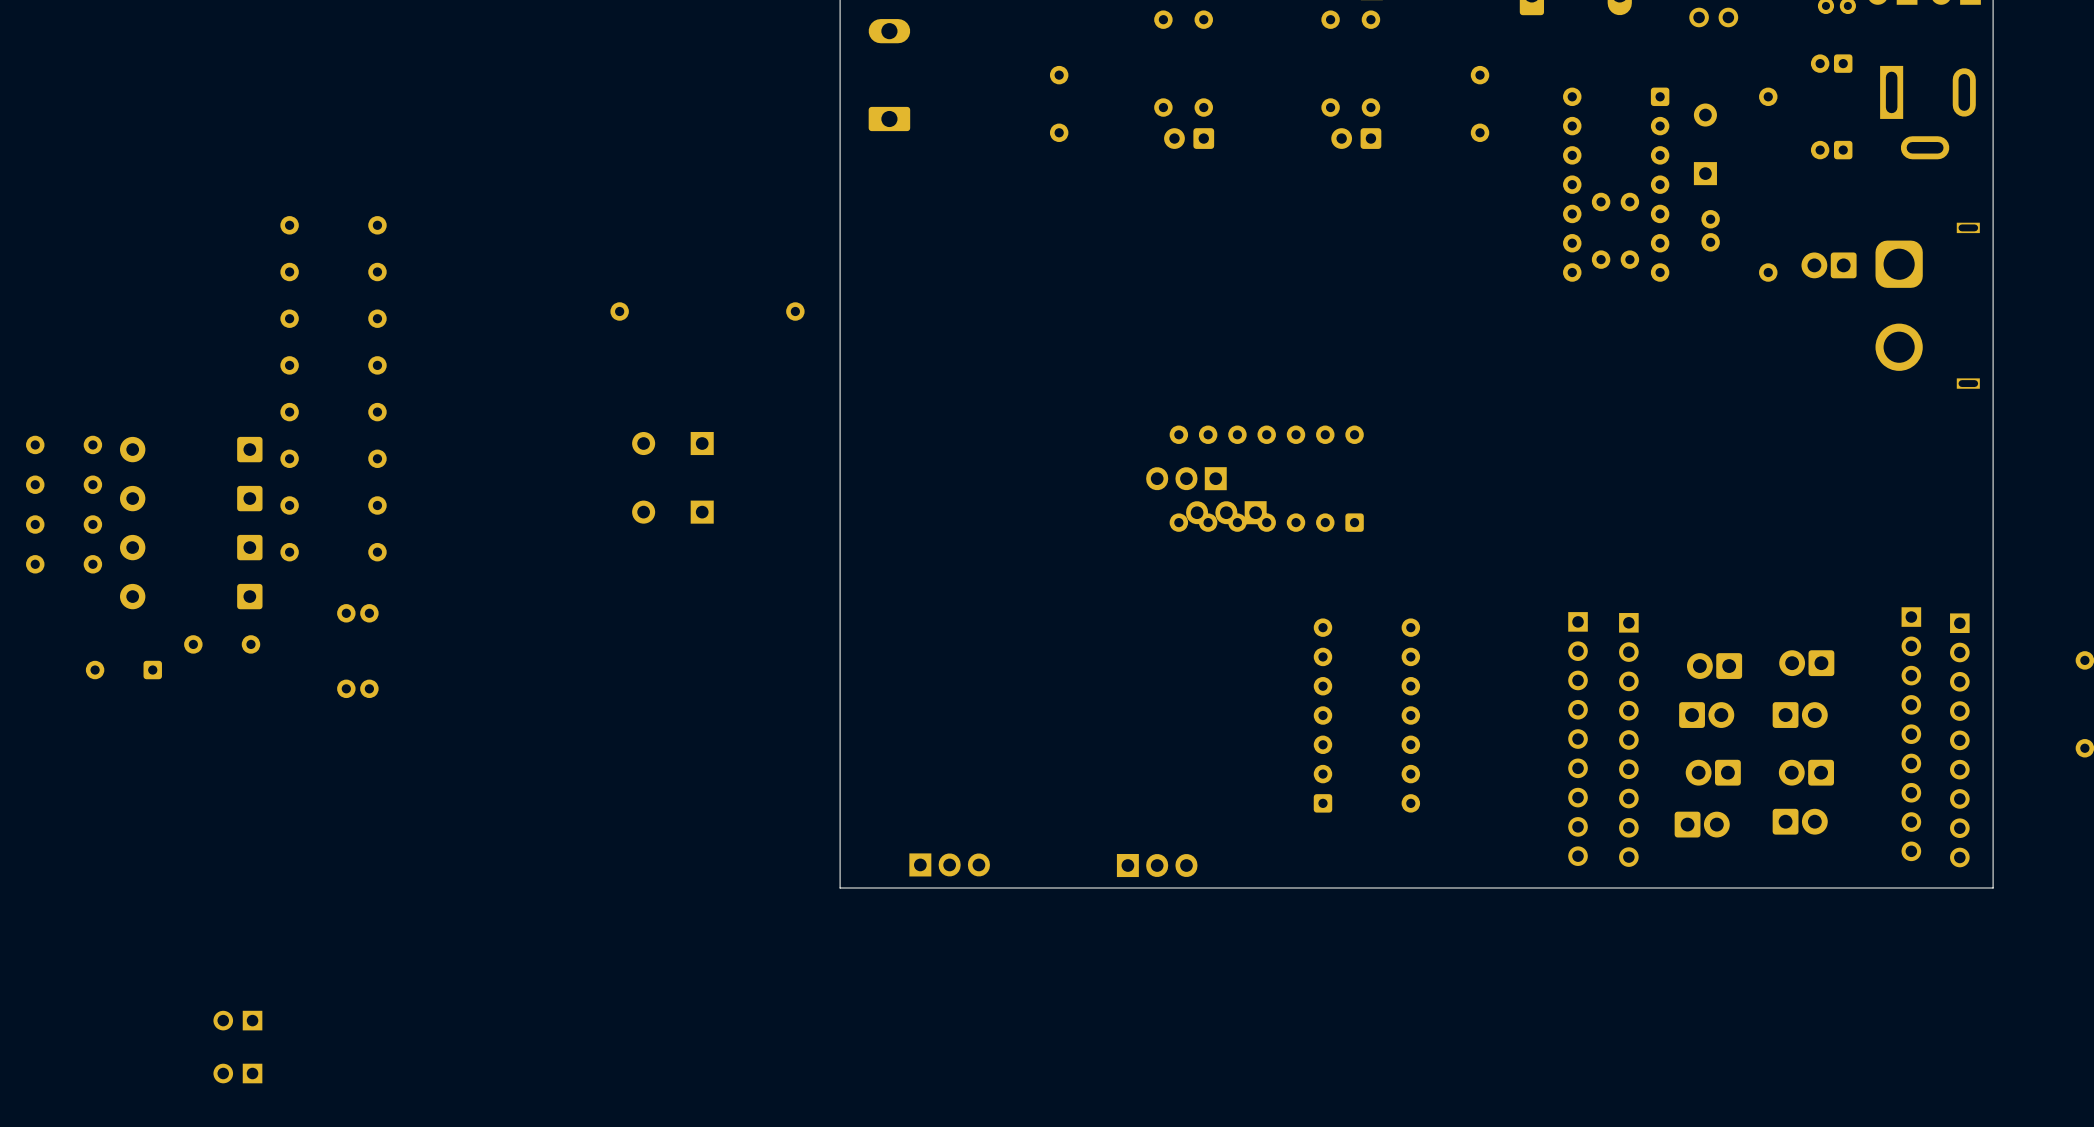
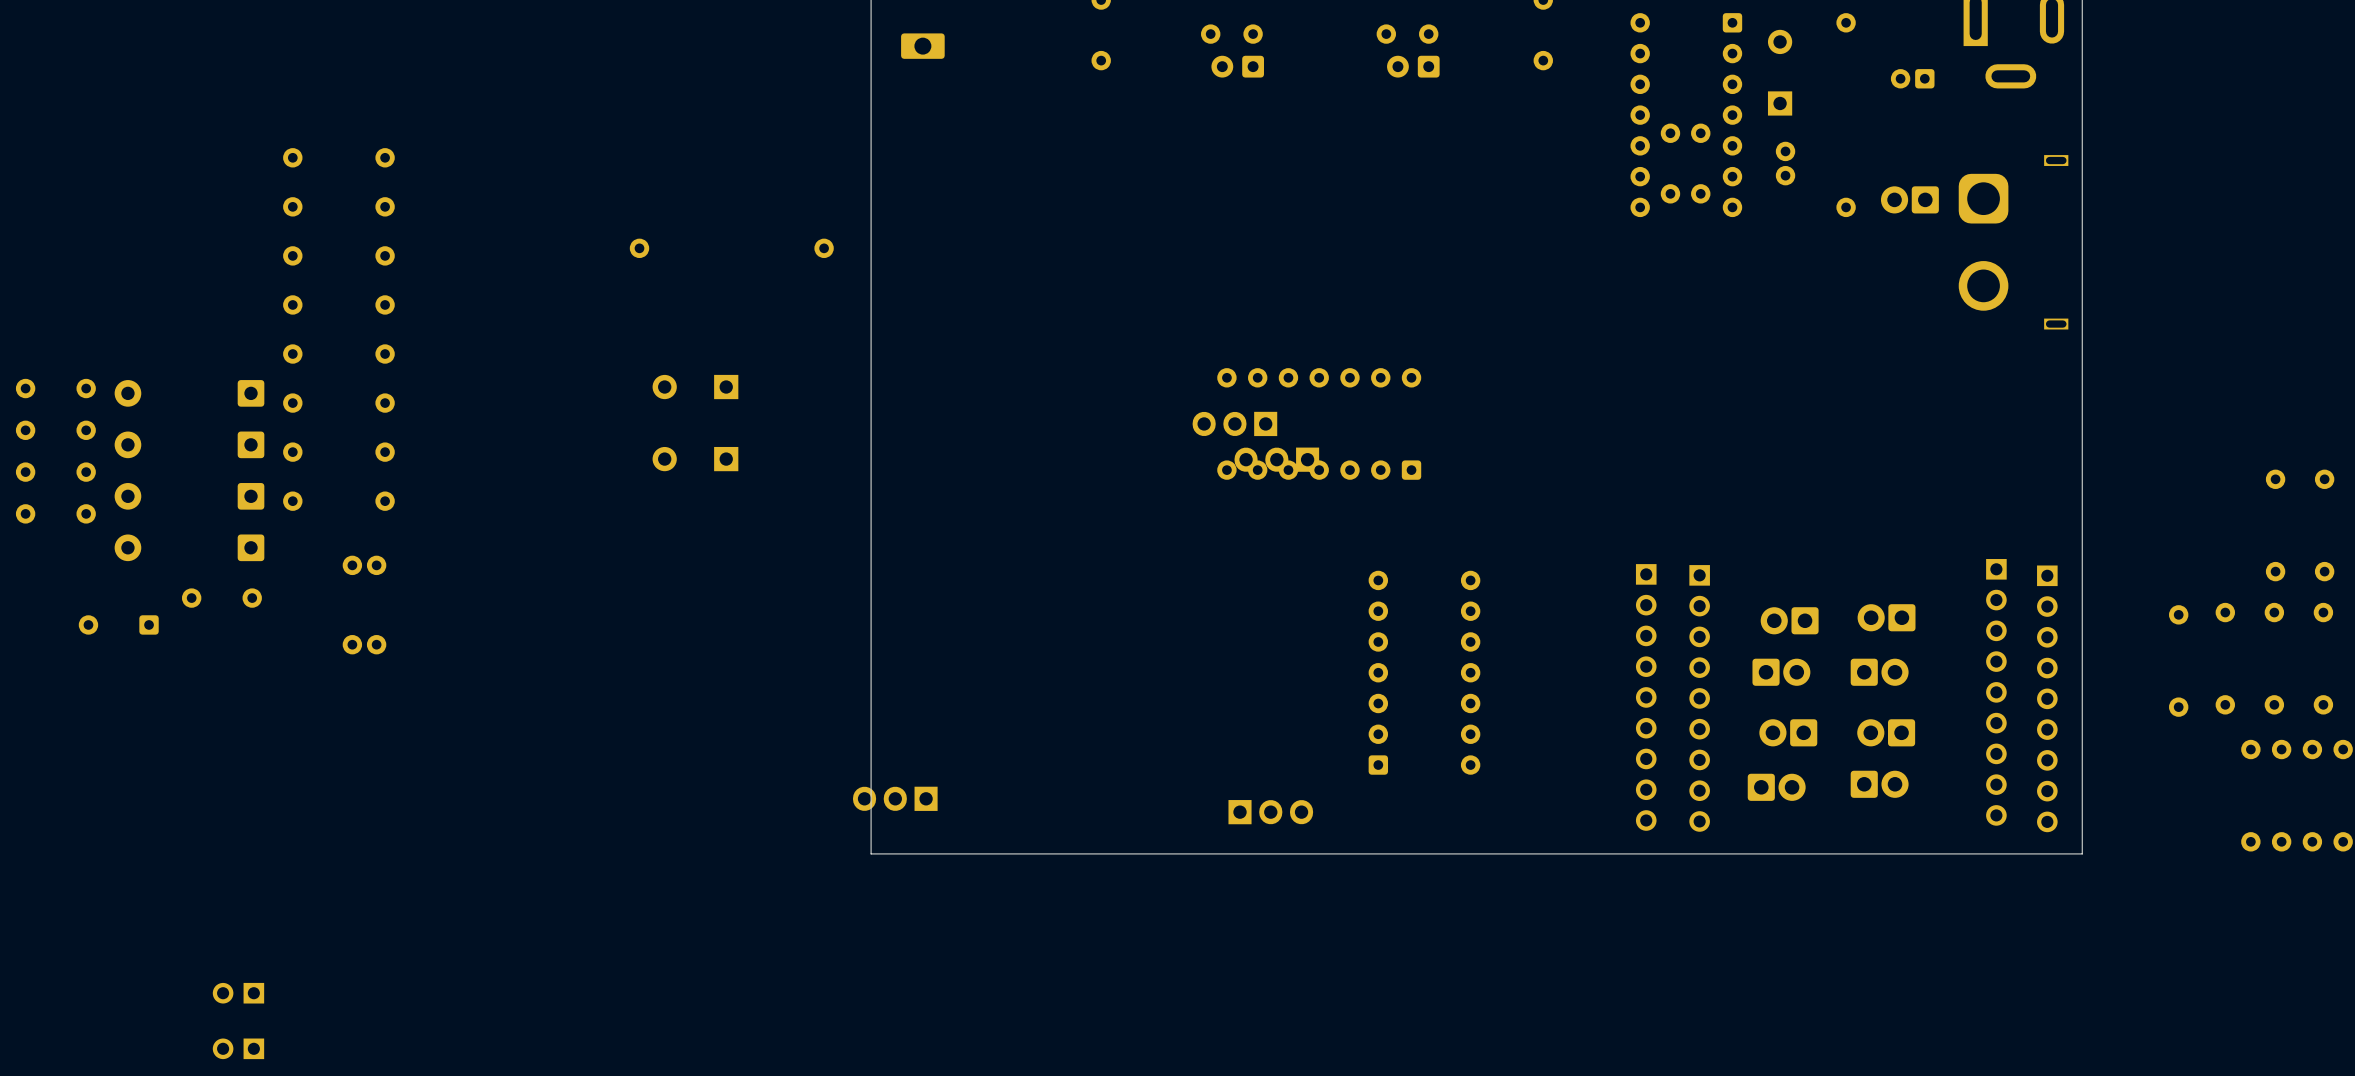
part rotation: 0° (949, 864) -> 180° (895, 798)
part position: (949, 864) -> (895, 798)
part position: (1157, 865) -> (1270, 812)

